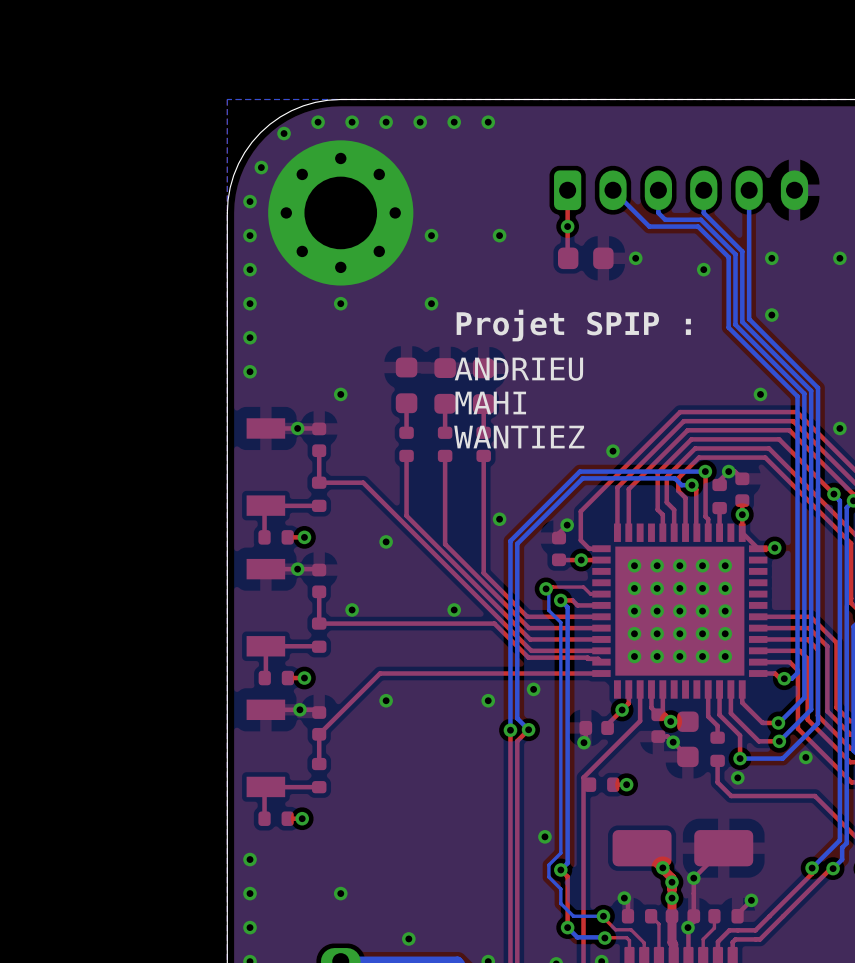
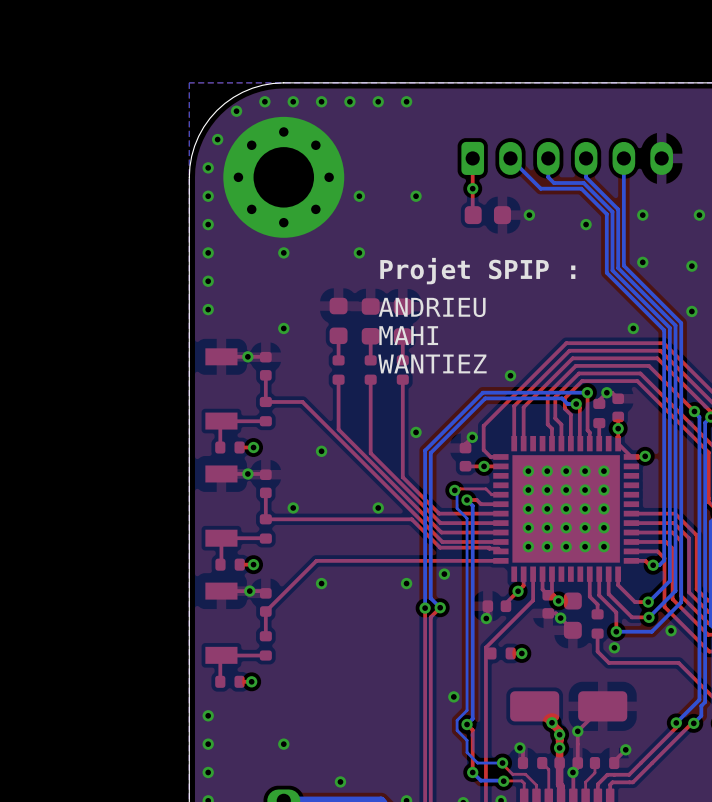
via: none -> (691, 266)
via: none -> (691, 311)
via: (839, 428) -> none

